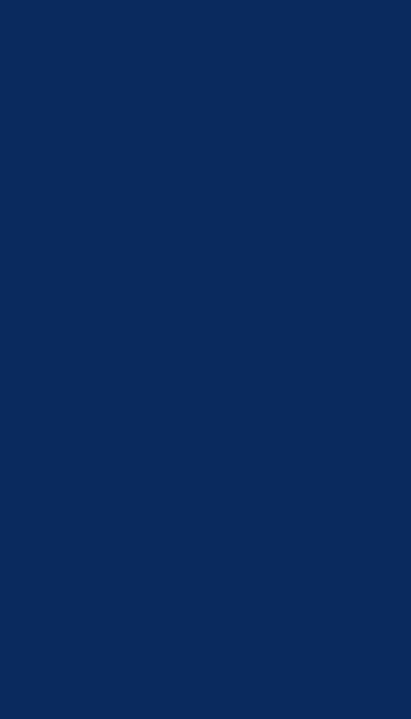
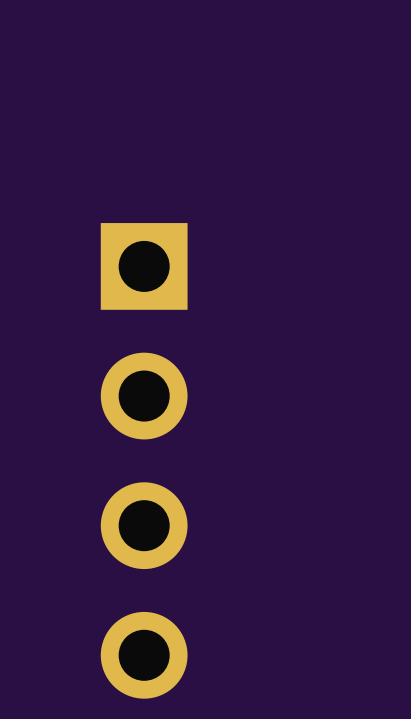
part: none -> (144, 460)

